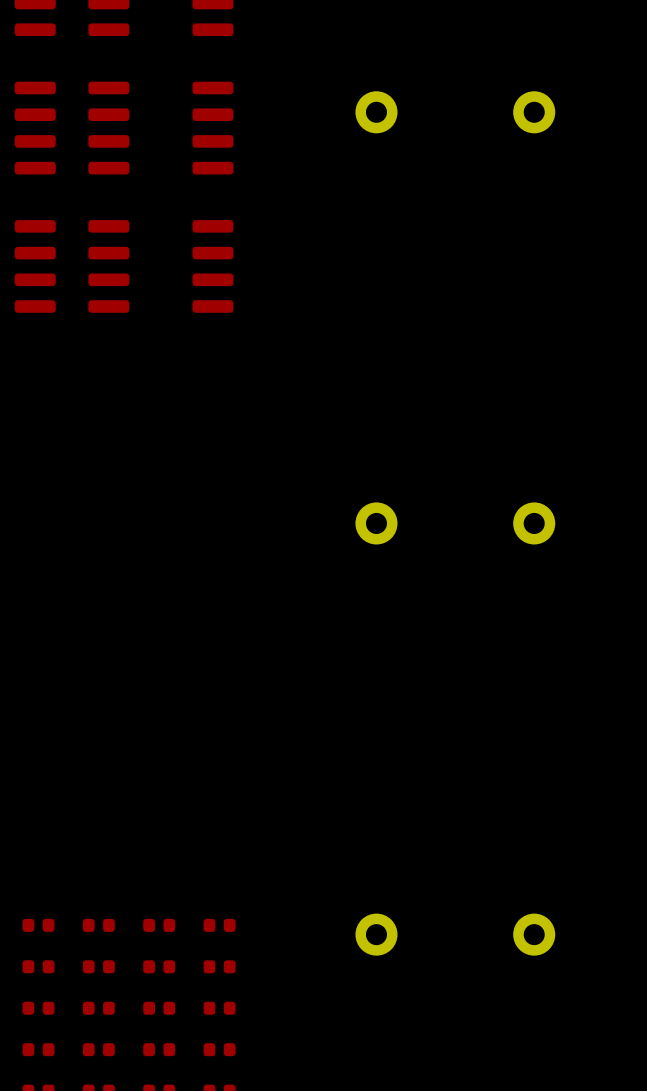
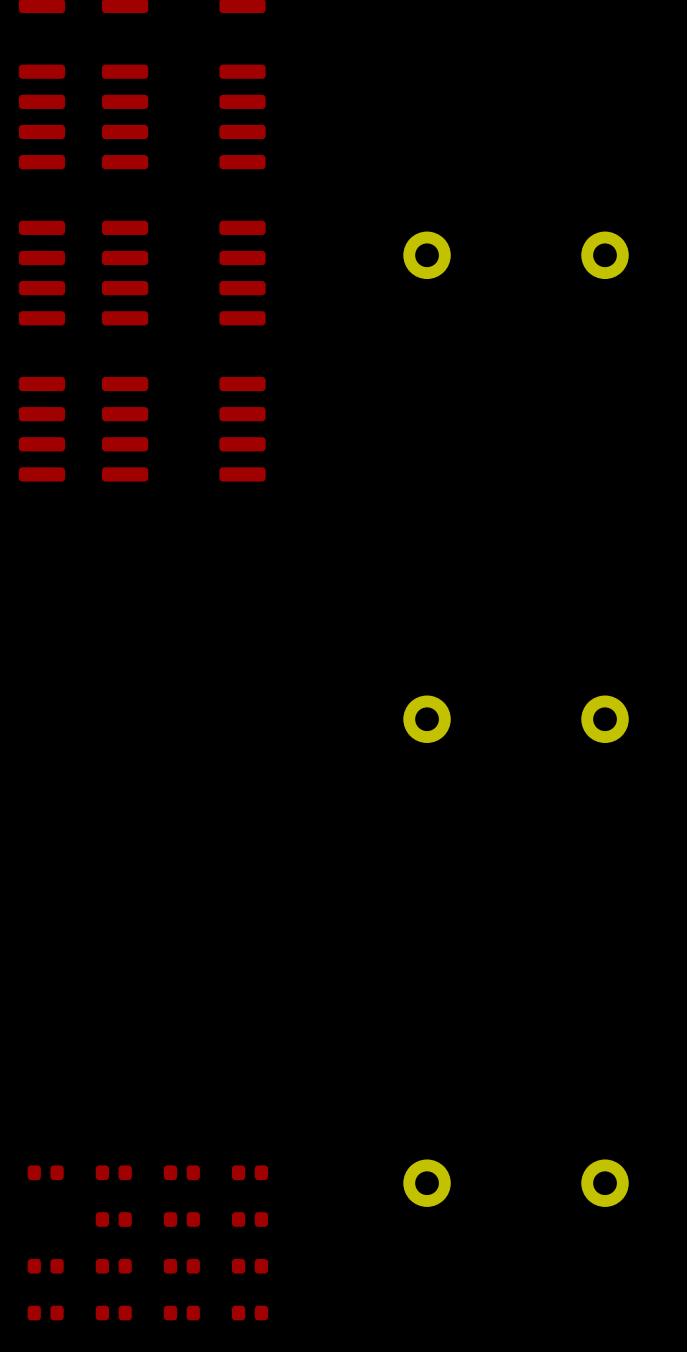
part: (38, 966) -> none

